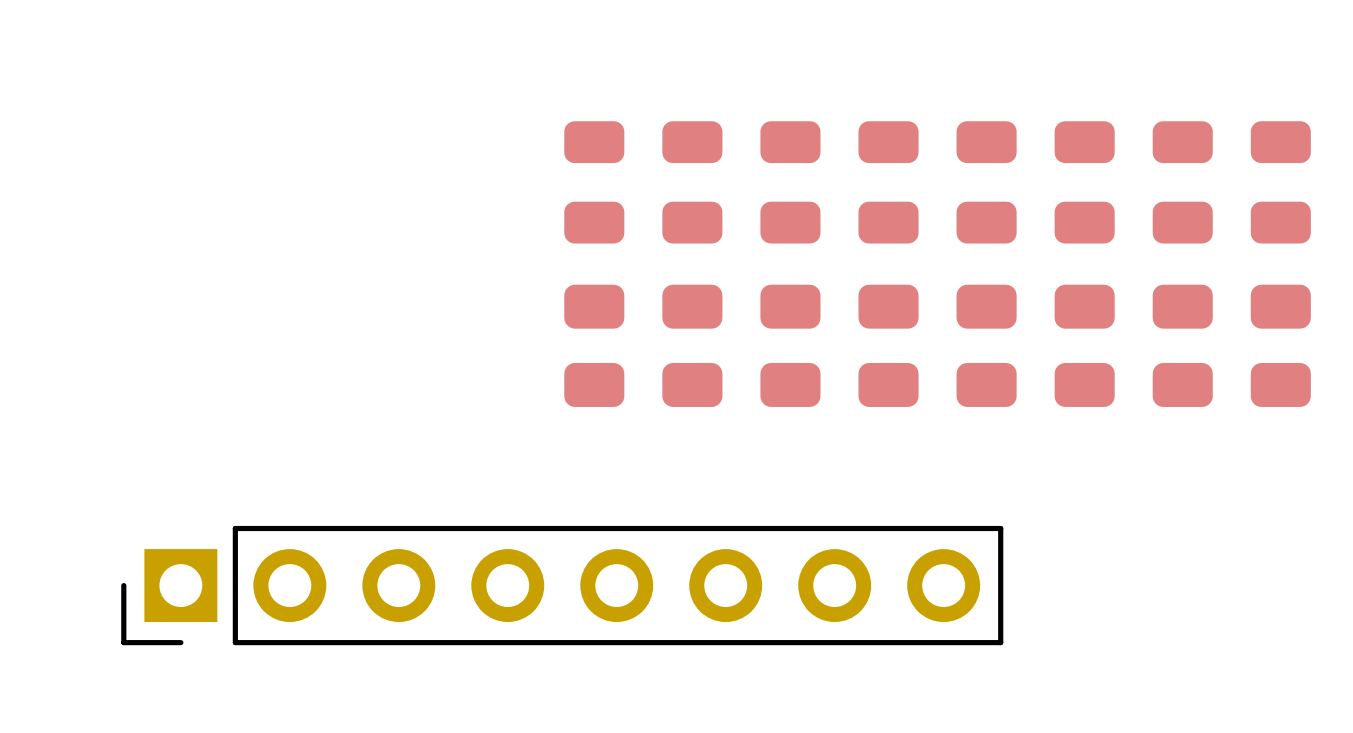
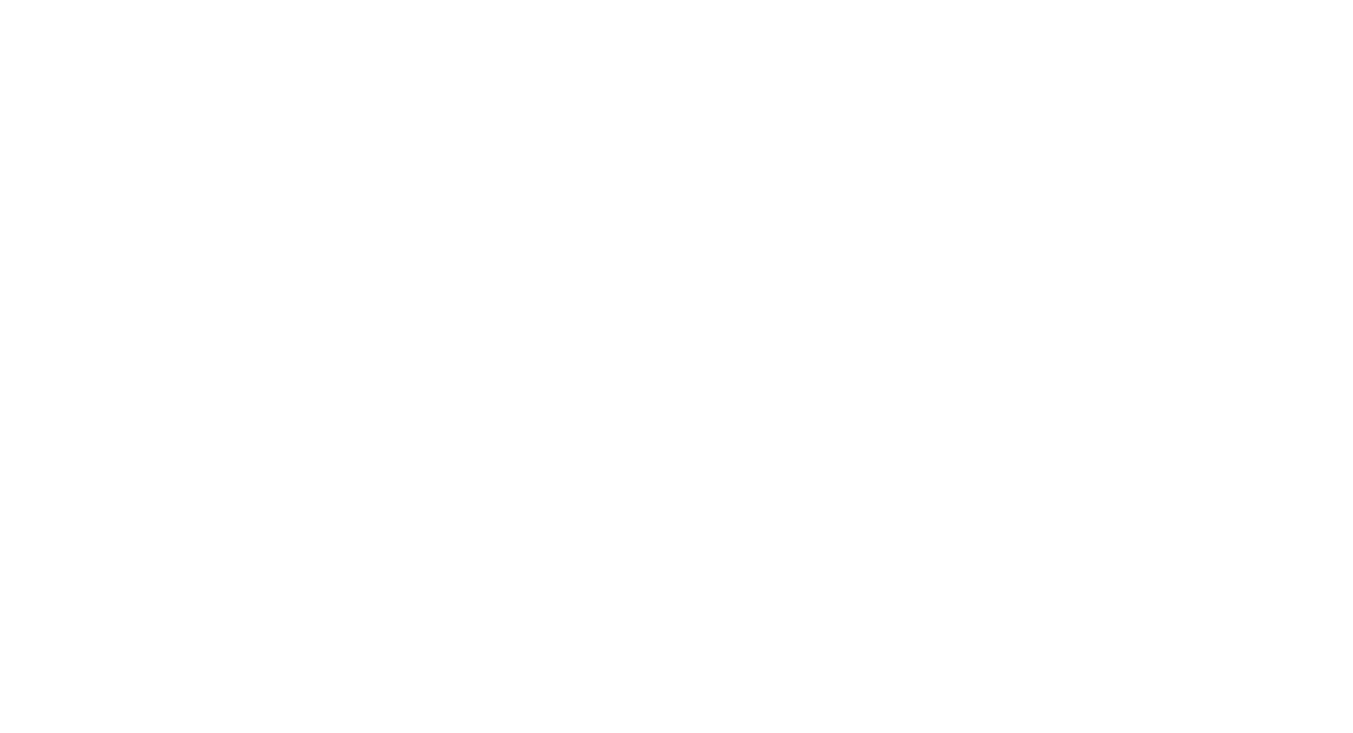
part: (594, 182) -> none
part: (692, 182) -> none
part: (790, 182) -> none
part: (888, 182) -> none
part: (986, 182) -> none
part: (1084, 182) -> none
part: (1182, 182) -> none
part: (1280, 182) -> none
part: (594, 345) -> none
part: (692, 345) -> none
part: (790, 345) -> none
part: (888, 345) -> none
part: (986, 345) -> none
part: (1084, 345) -> none
part: (1182, 345) -> none
part: (1280, 345) -> none
part: (562, 585) -> none

